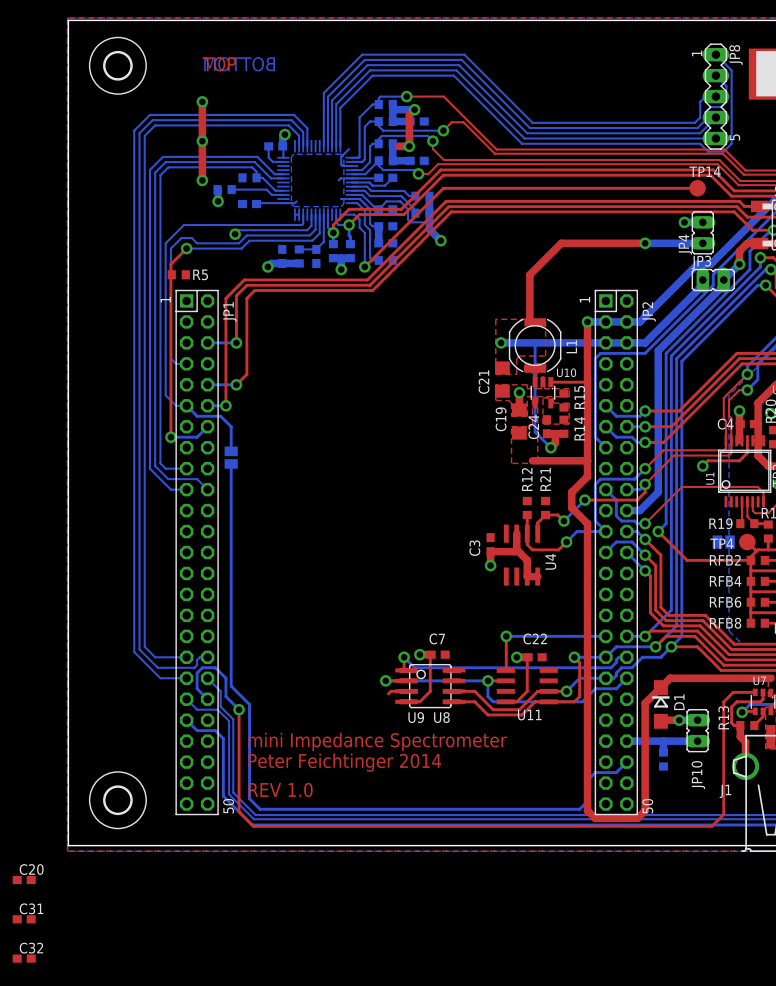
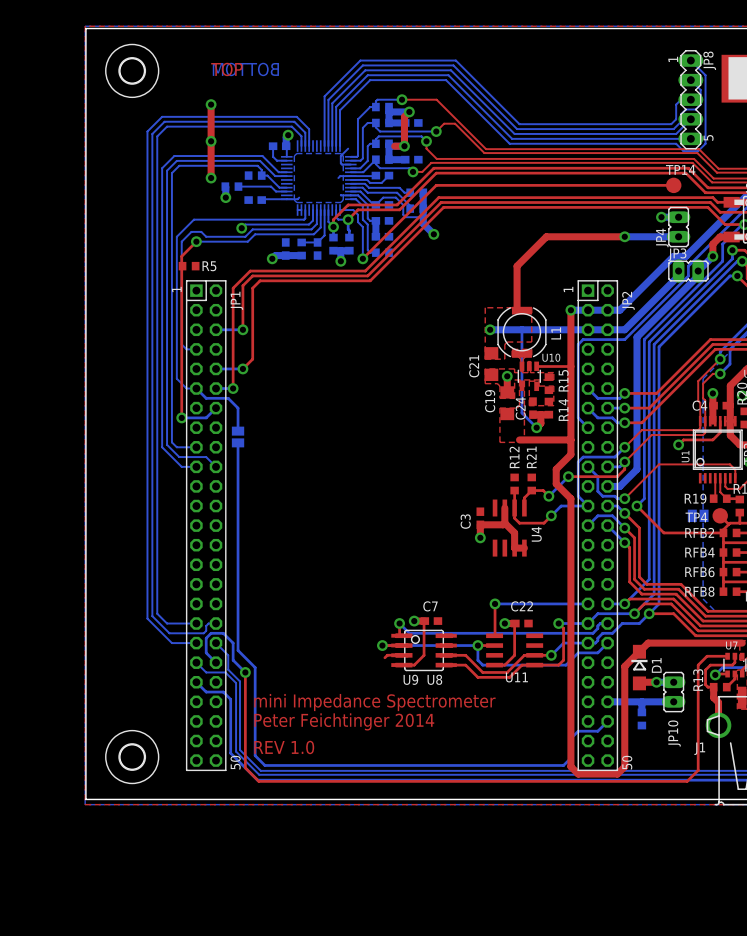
C20: (24, 880) -> none
C31: (24, 919) -> none
C32: (24, 958) -> none

